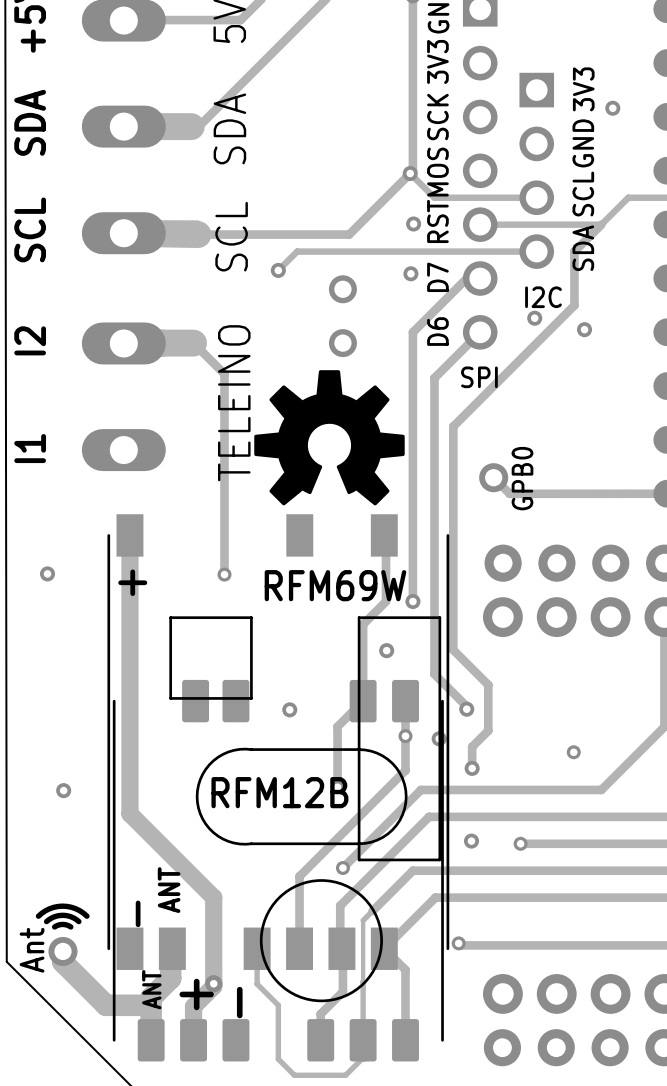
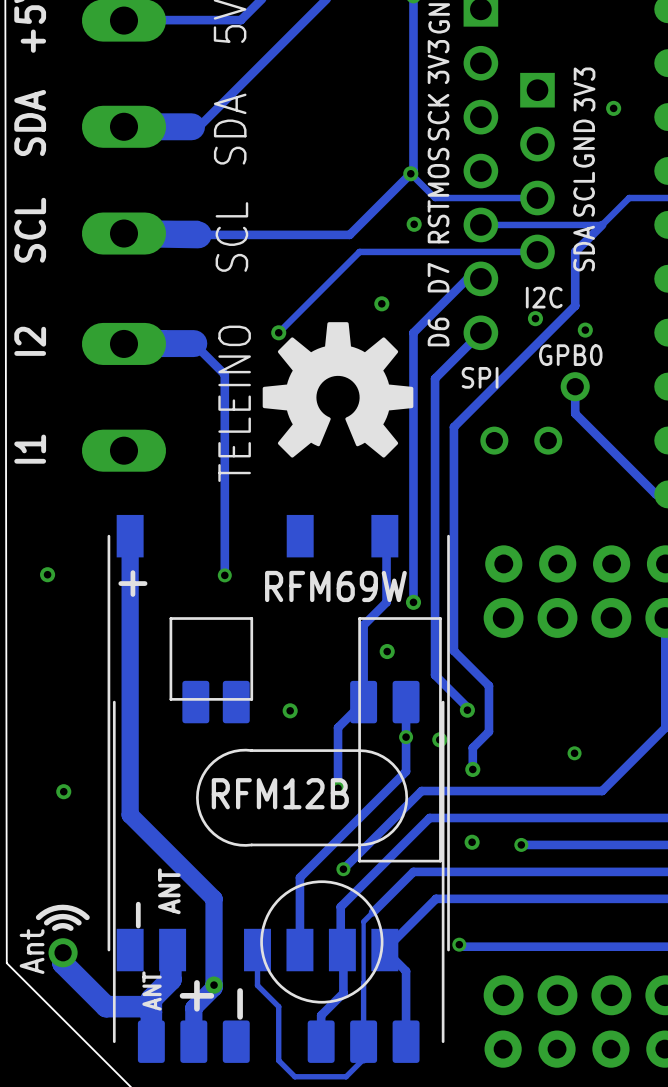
track: (359, 251) (297, 251) (278, 270) -> (359, 251) (278, 332)
via: (278, 270) -> none
via position: (410, 273) -> (381, 303)
part rotation: 0° (342, 316) -> 90° clockwise (521, 440)
part position: (342, 316) -> (521, 440)
via: none -> (278, 332)
drawing position: (329, 437) -> (338, 389)
track: (493, 477) (509, 493) (655, 493) -> (575, 386) (575, 413) (655, 494)
part position: (493, 477) -> (575, 386)
text rotation: 0° (522, 478) -> 90° clockwise (570, 355)
text position: GPB0 (522, 478) -> GPB0 (570, 355)

